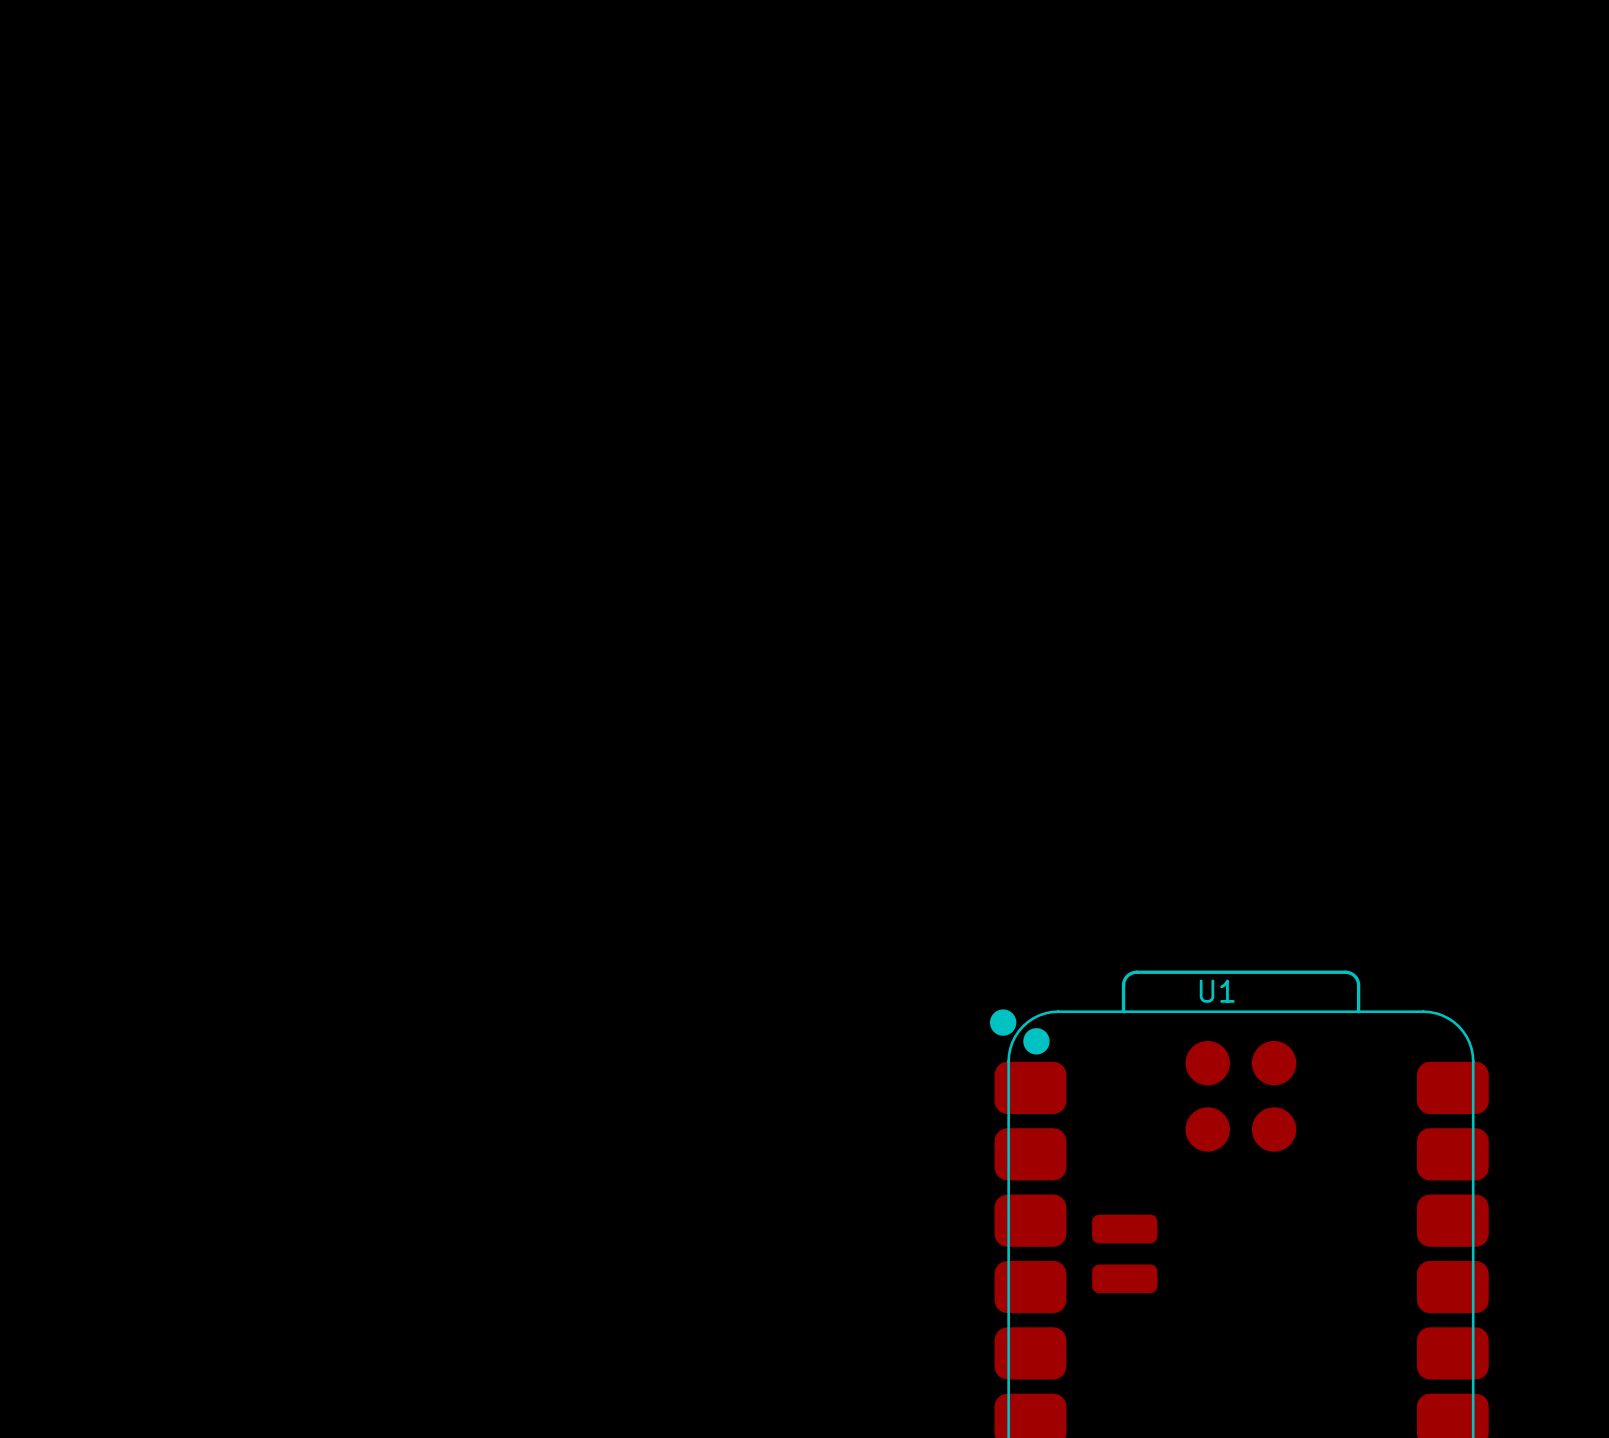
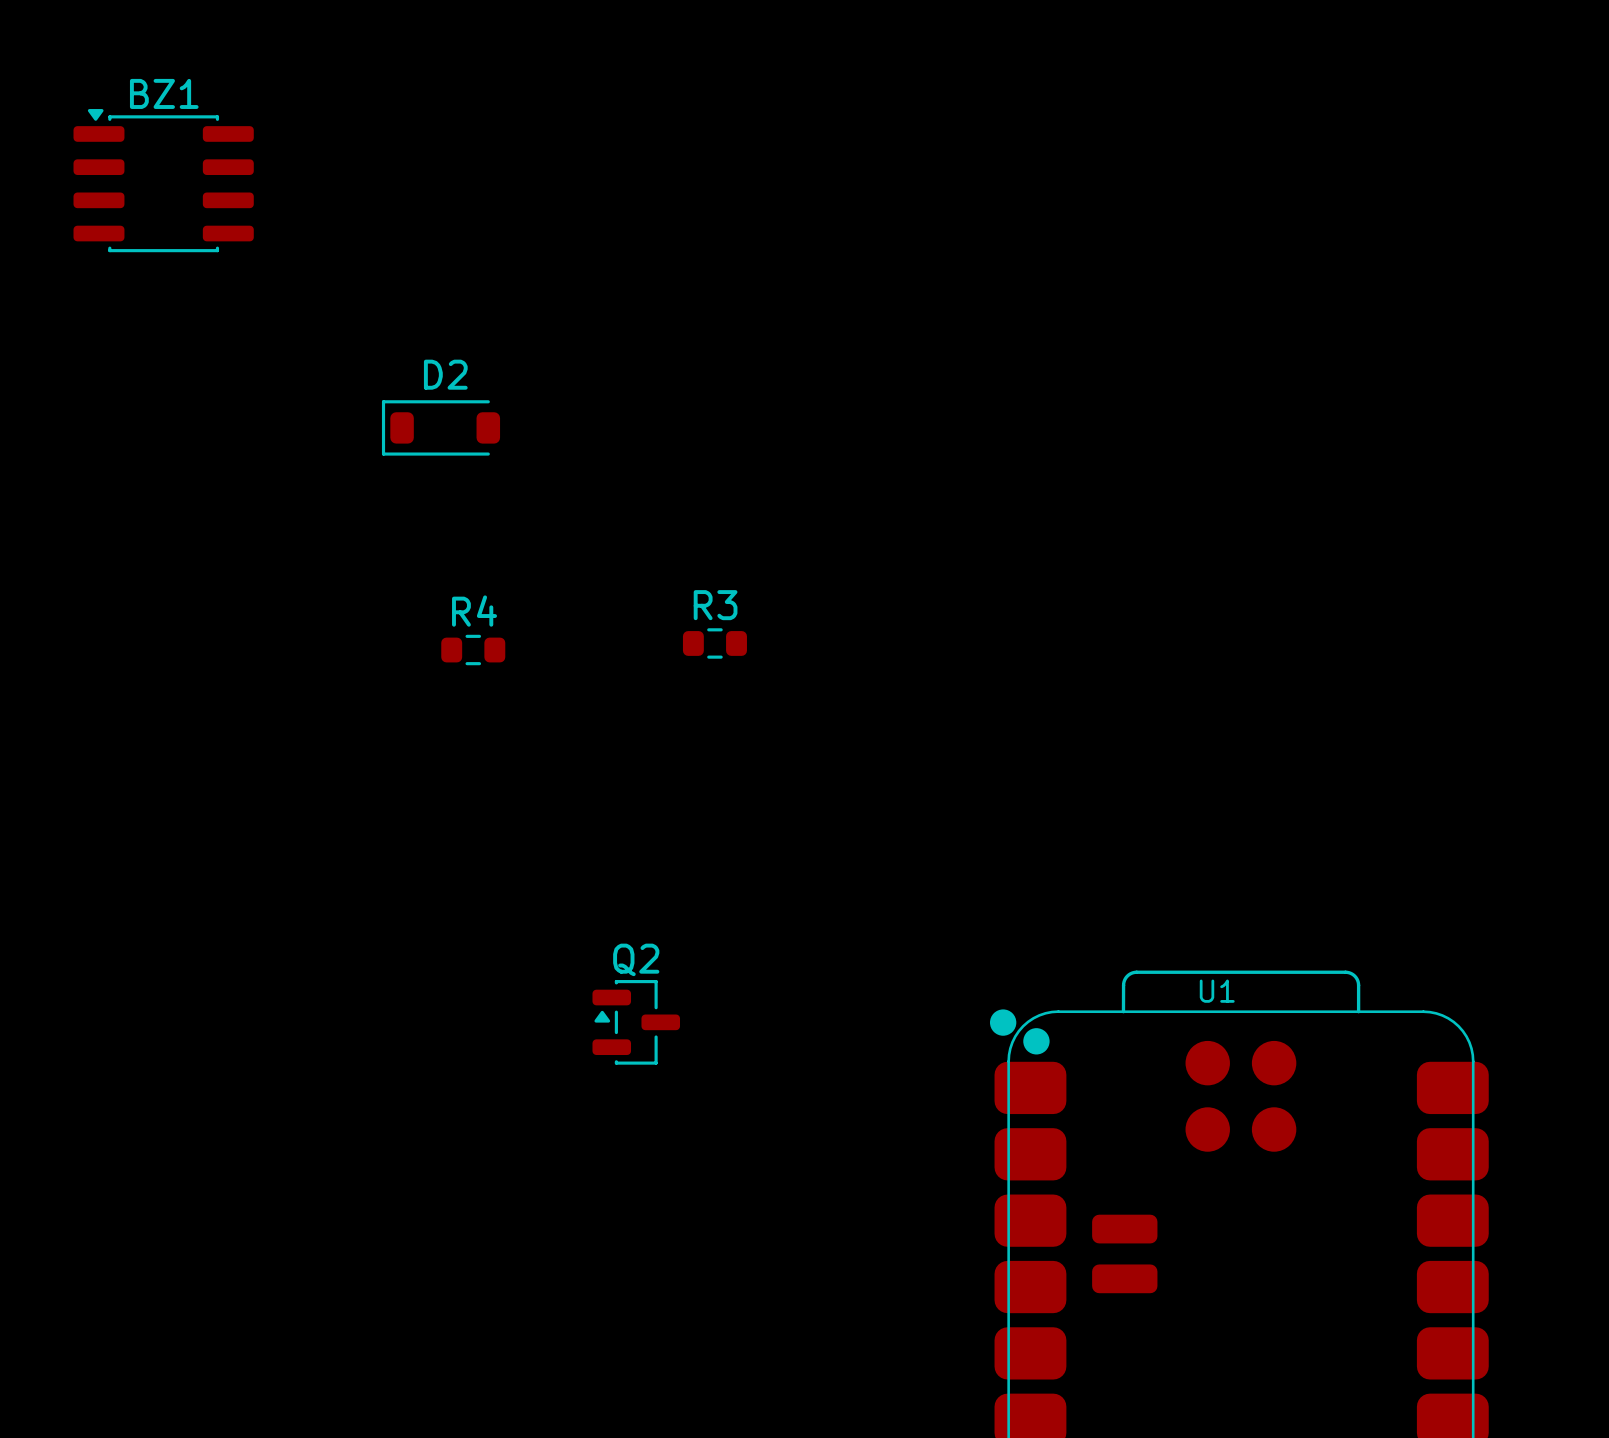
BZ1: none -> (163, 180)
D2: none -> (441, 427)
R3: none -> (714, 643)
R4: none -> (473, 650)
Q2: none -> (636, 1022)

